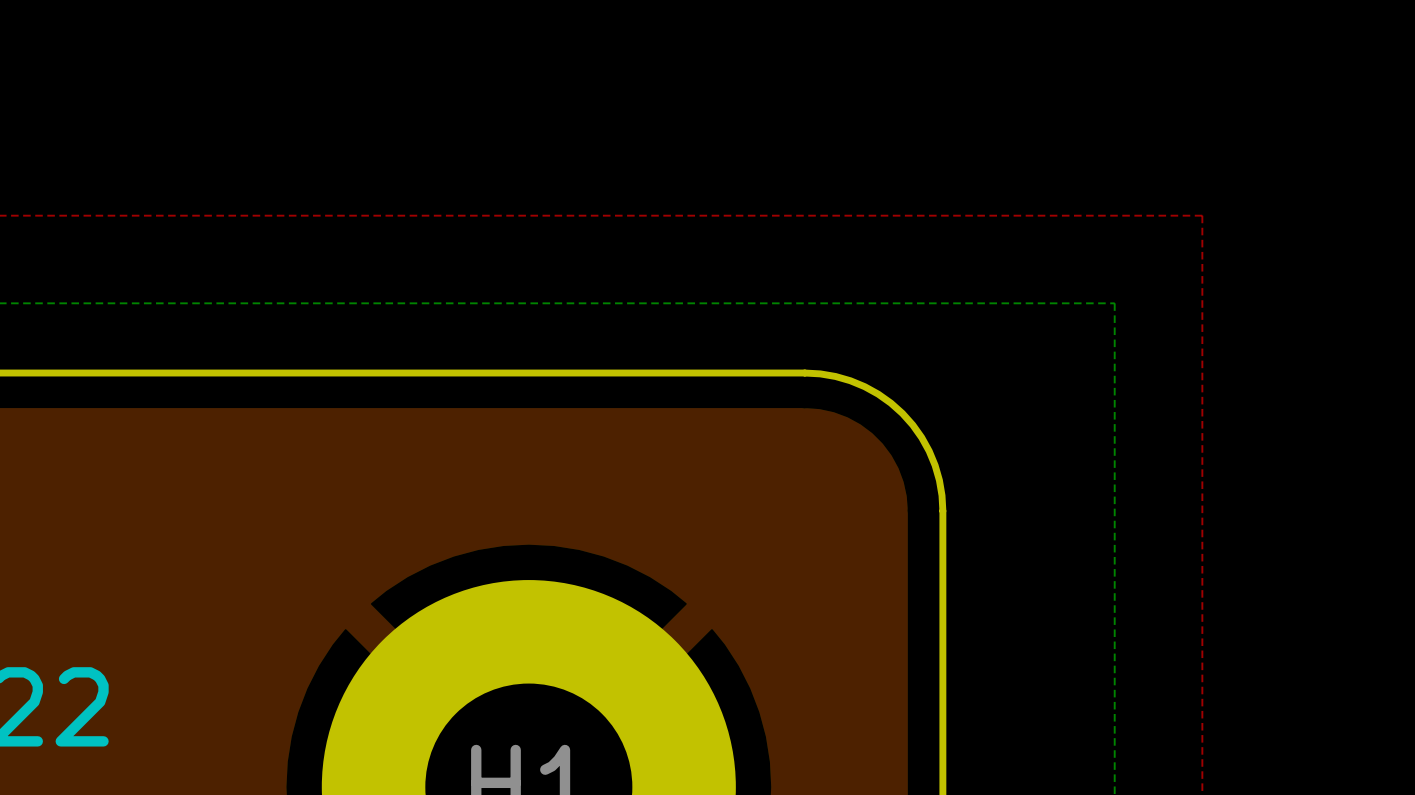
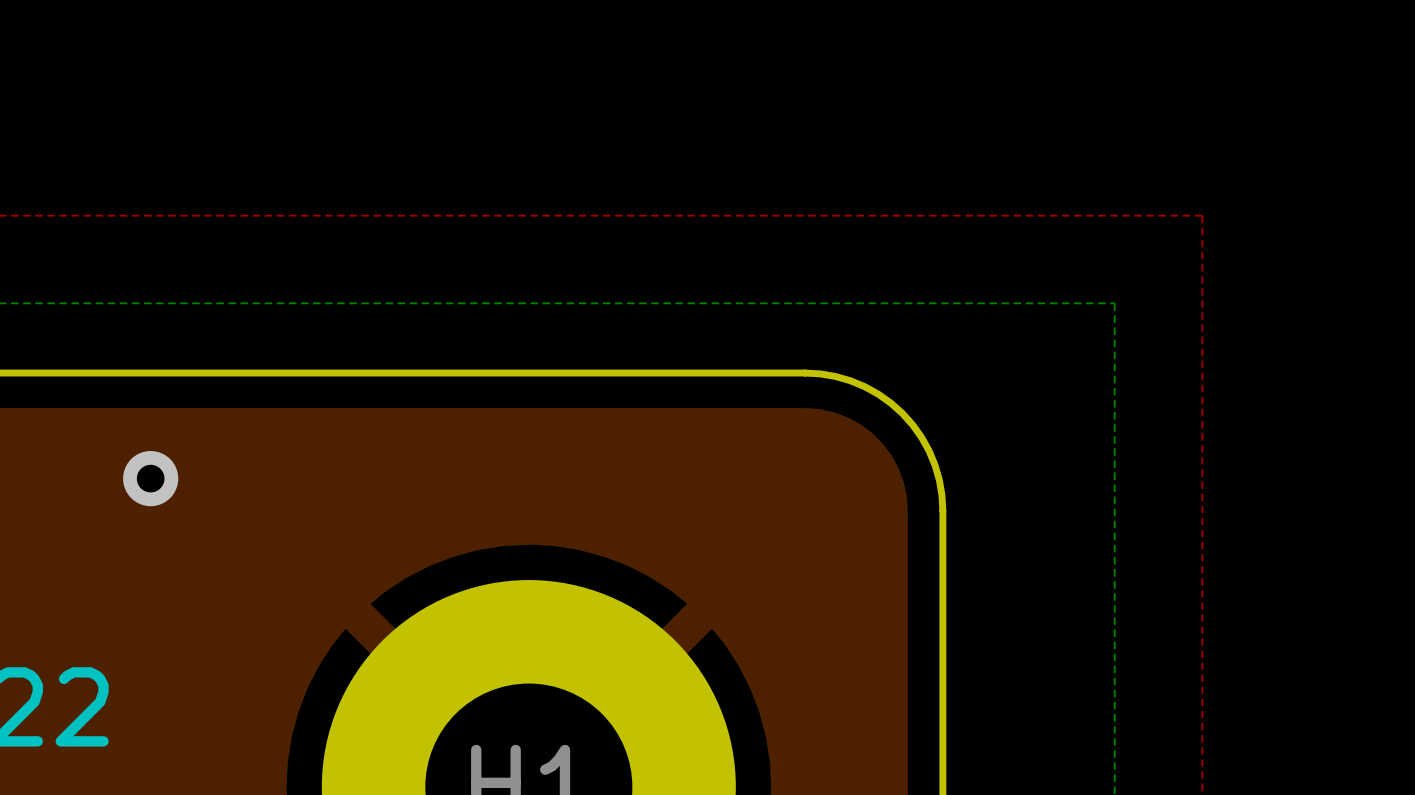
via: none -> (150, 478)

